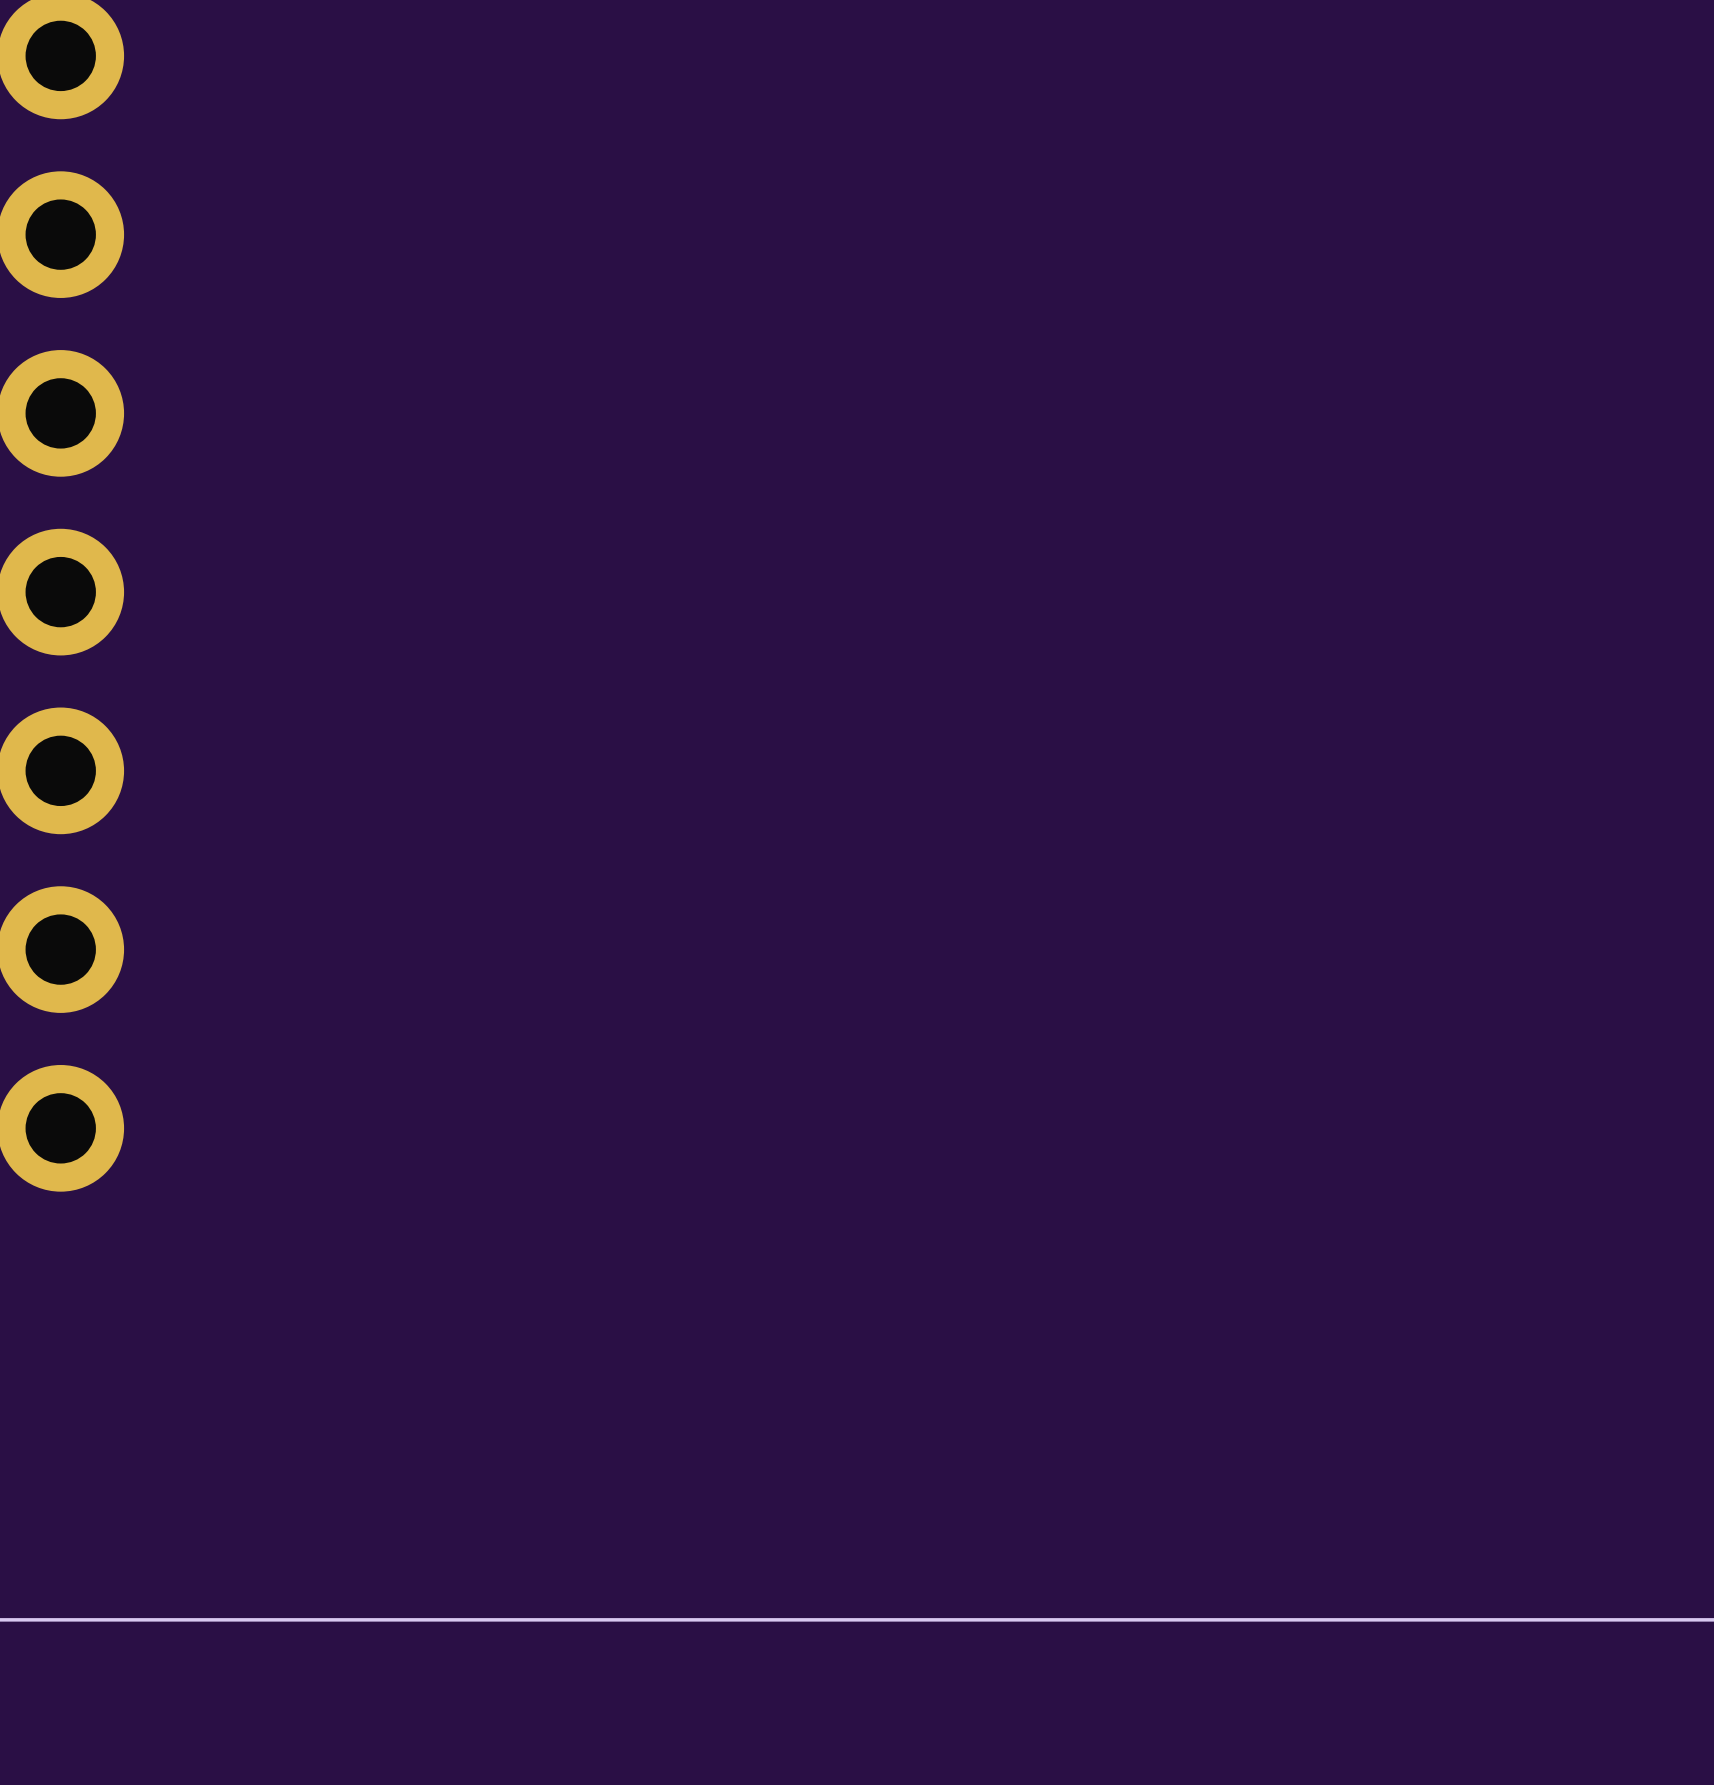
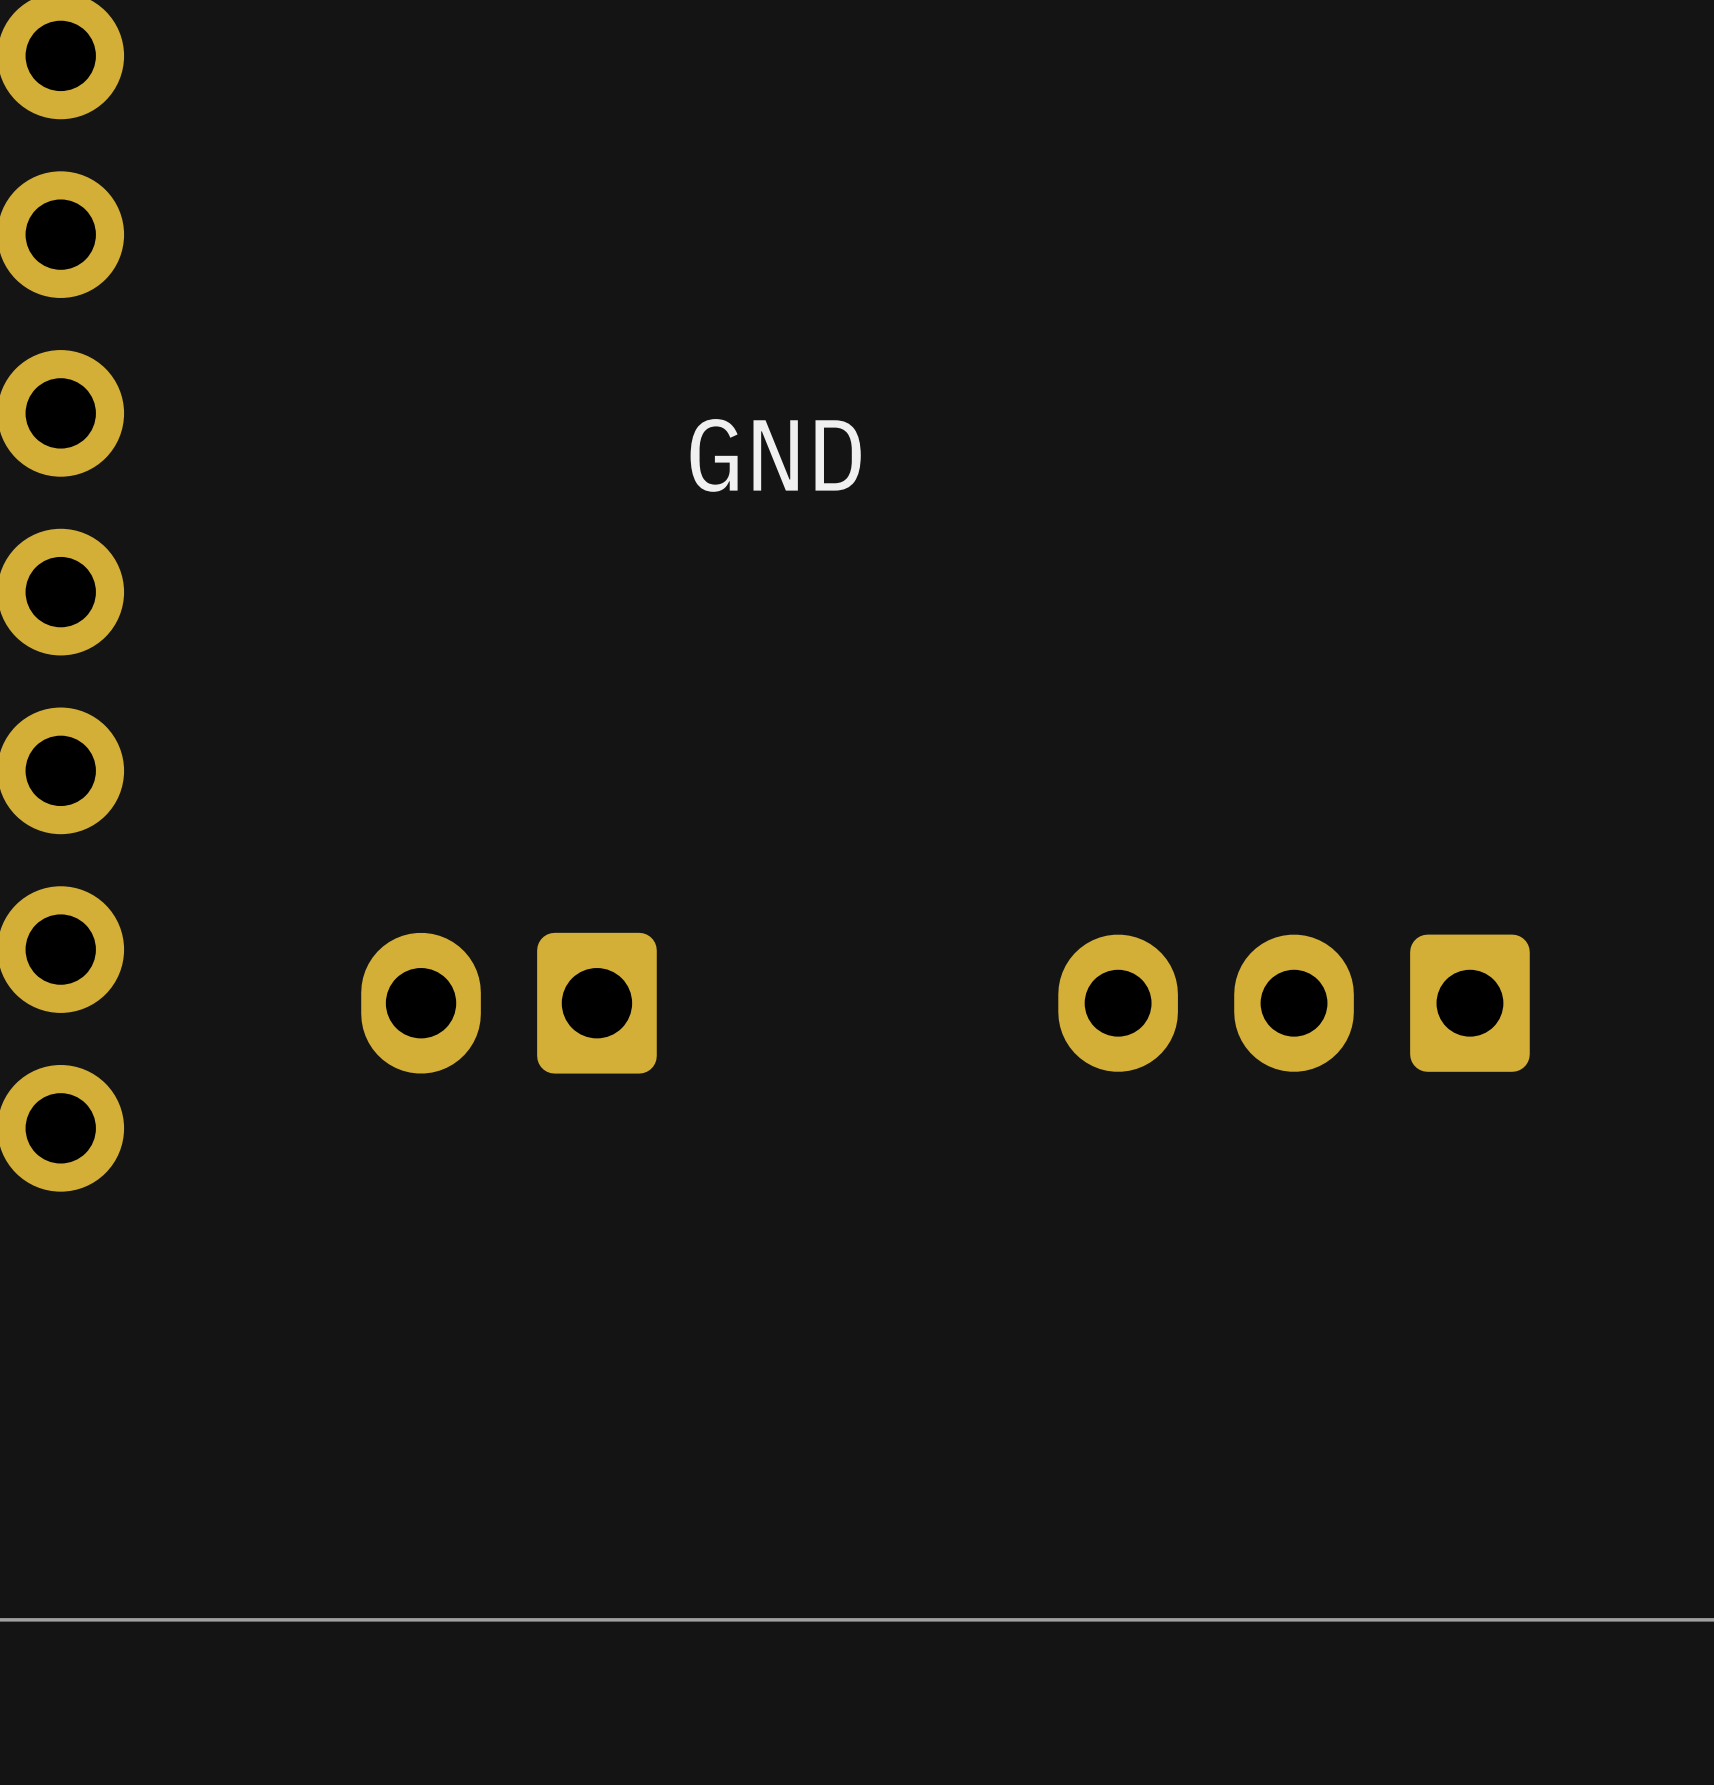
text: none -> GND (775, 455)
part: none -> (508, 1003)
part: none -> (1294, 1003)

